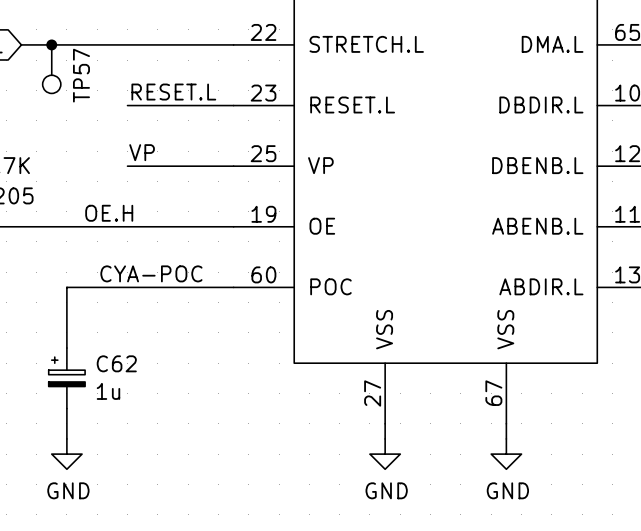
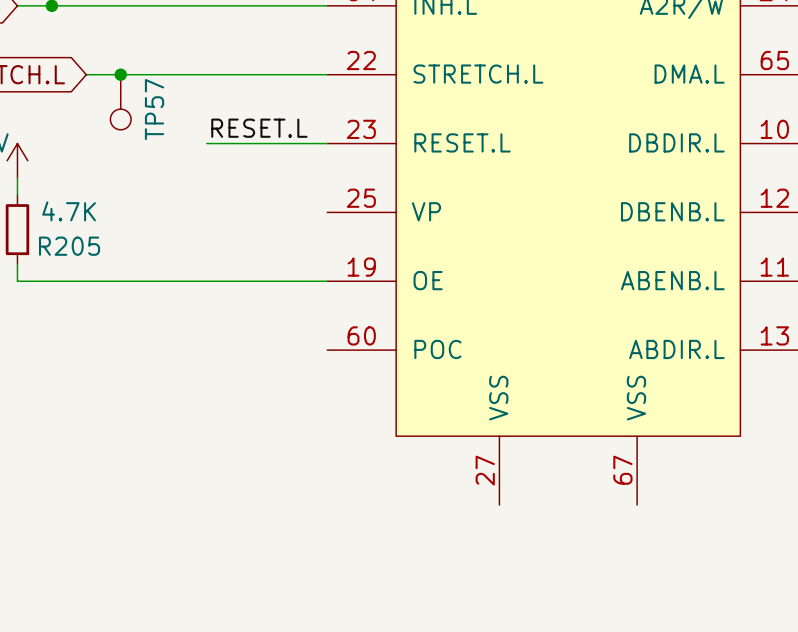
label: VP (142, 152) -> none
wire: (127, 166) (233, 166) -> none
label: OE.H (109, 213) -> none
label: CYA-POC (151, 273) -> none
wire: (233, 287) (66, 287) (66, 348) -> none
C62: 1u (66, 378) -> none
wire: (66, 408) (66, 438) -> none
wire: (385, 423) (385, 438) -> none
wire: (506, 423) (506, 438) -> none
power symbol: GND (66, 454) -> none
power symbol: GND (385, 454) -> none
power symbol: GND (506, 454) -> none

